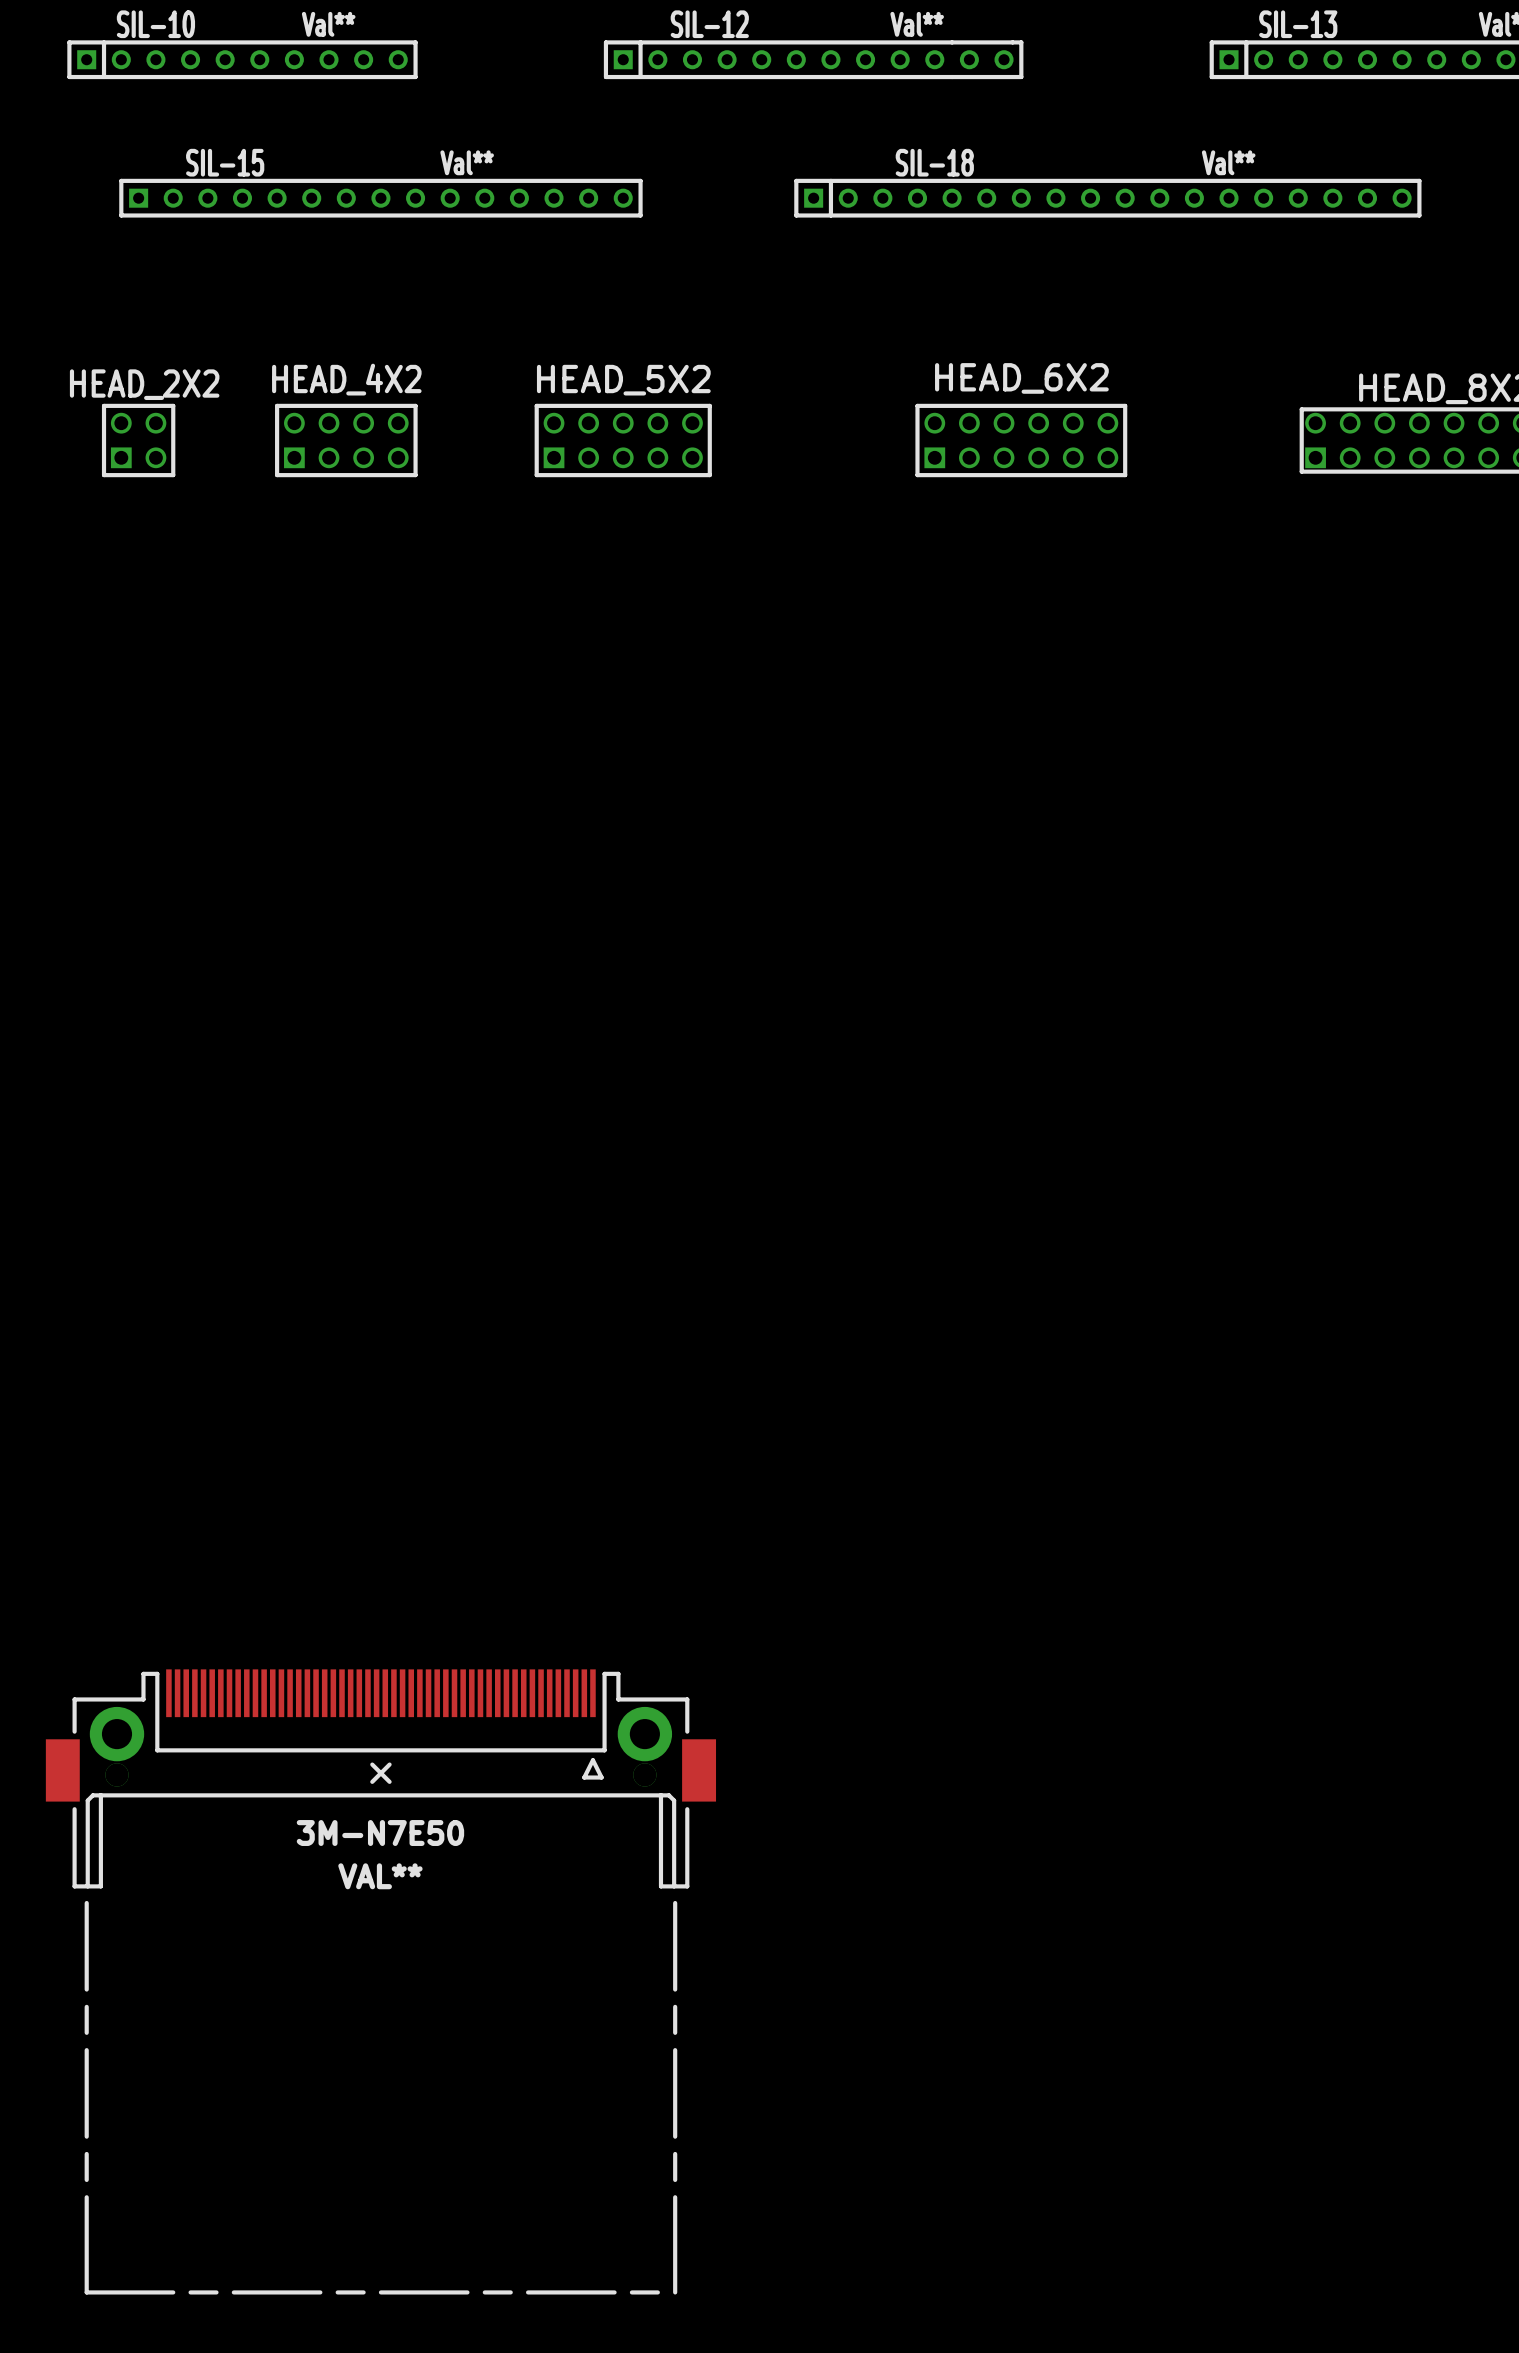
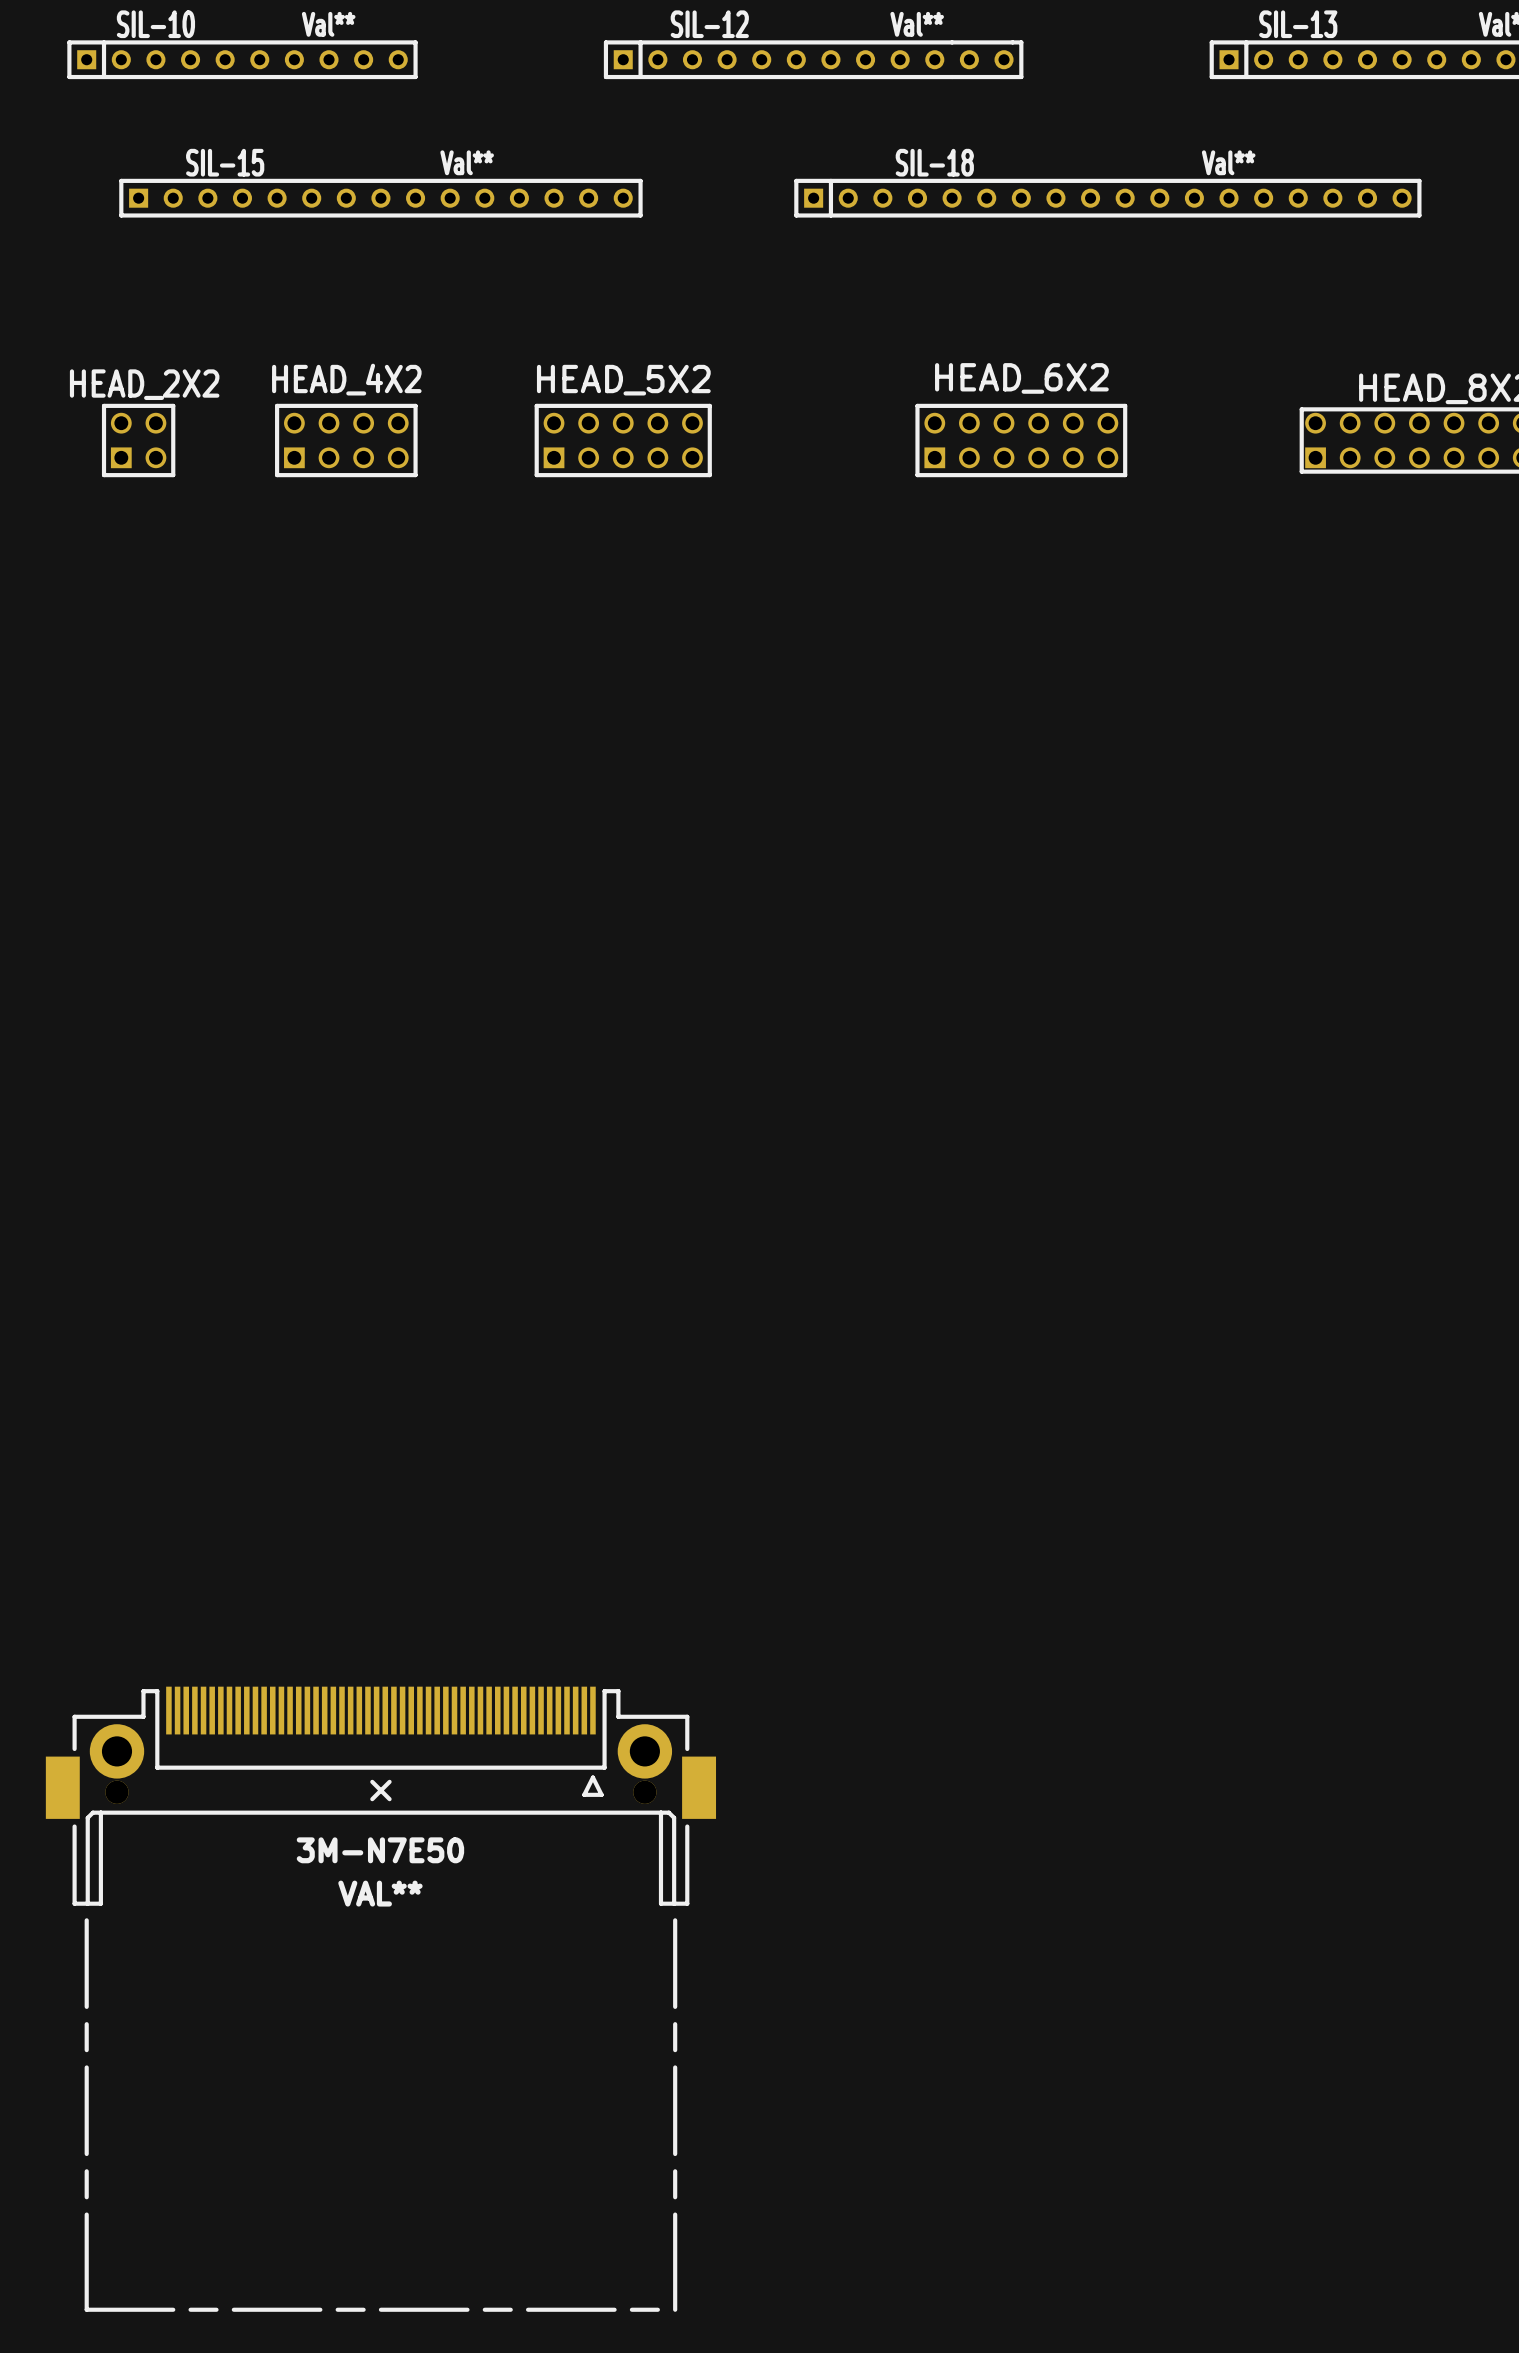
3M-N7E50 position: (380, 1981) -> (380, 1999)

